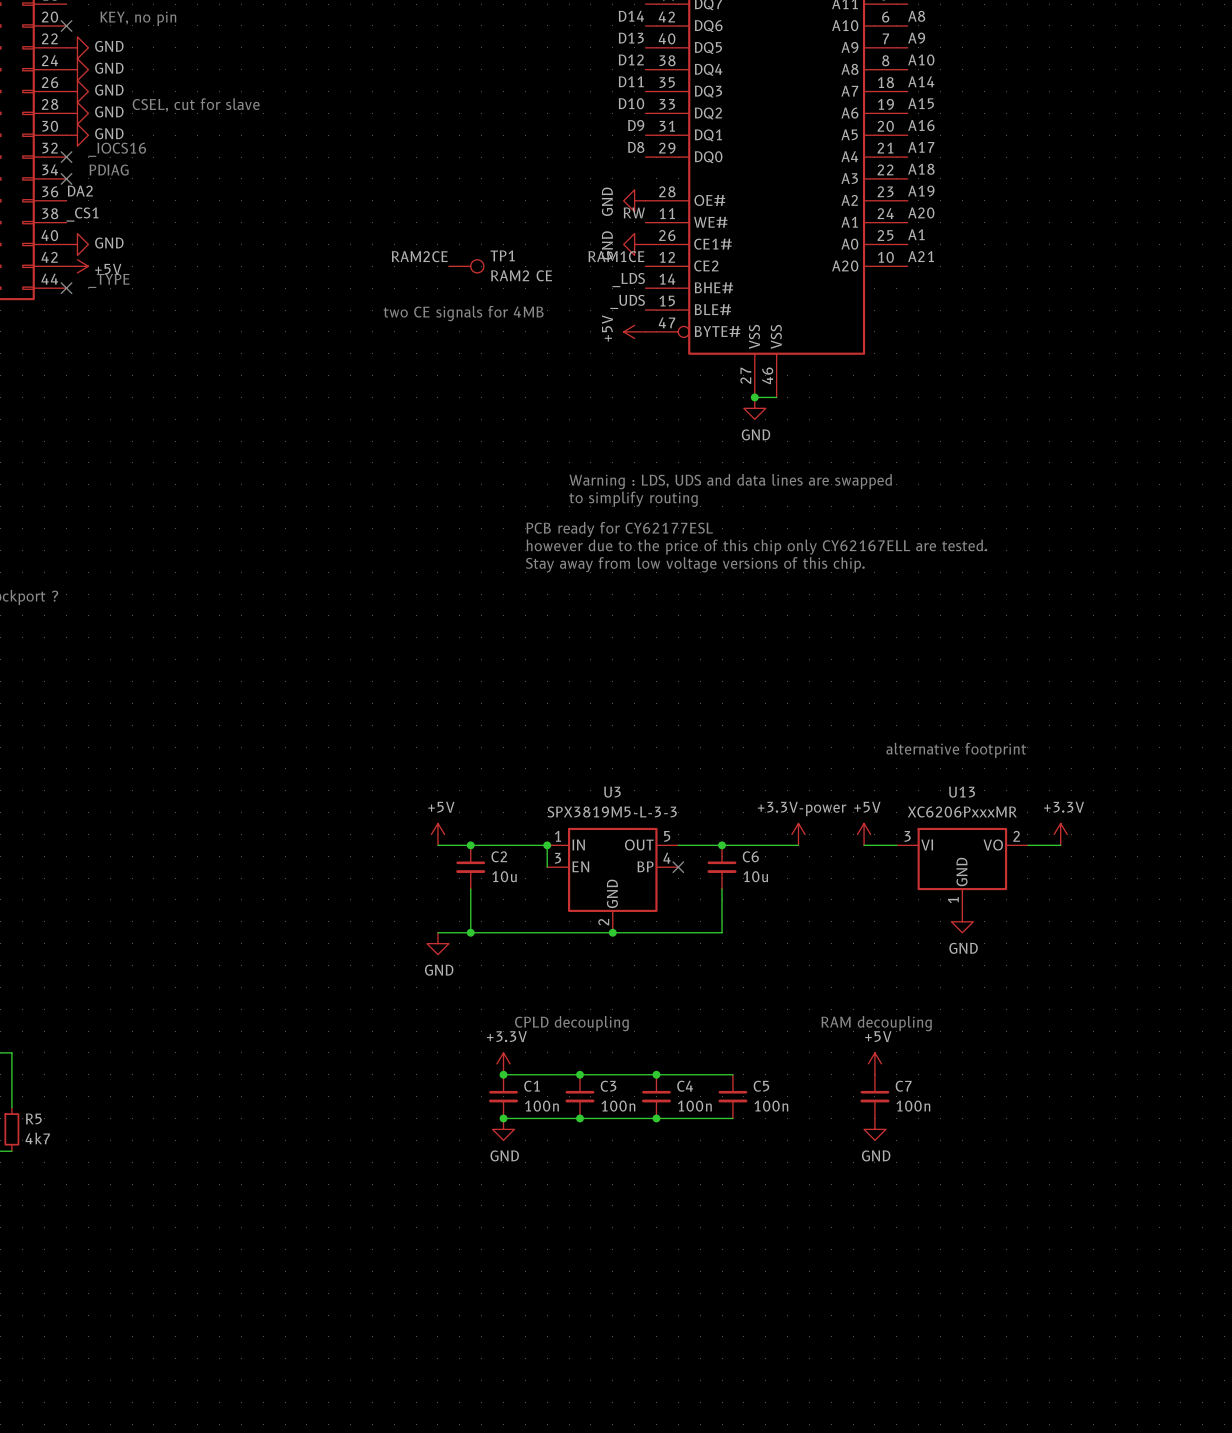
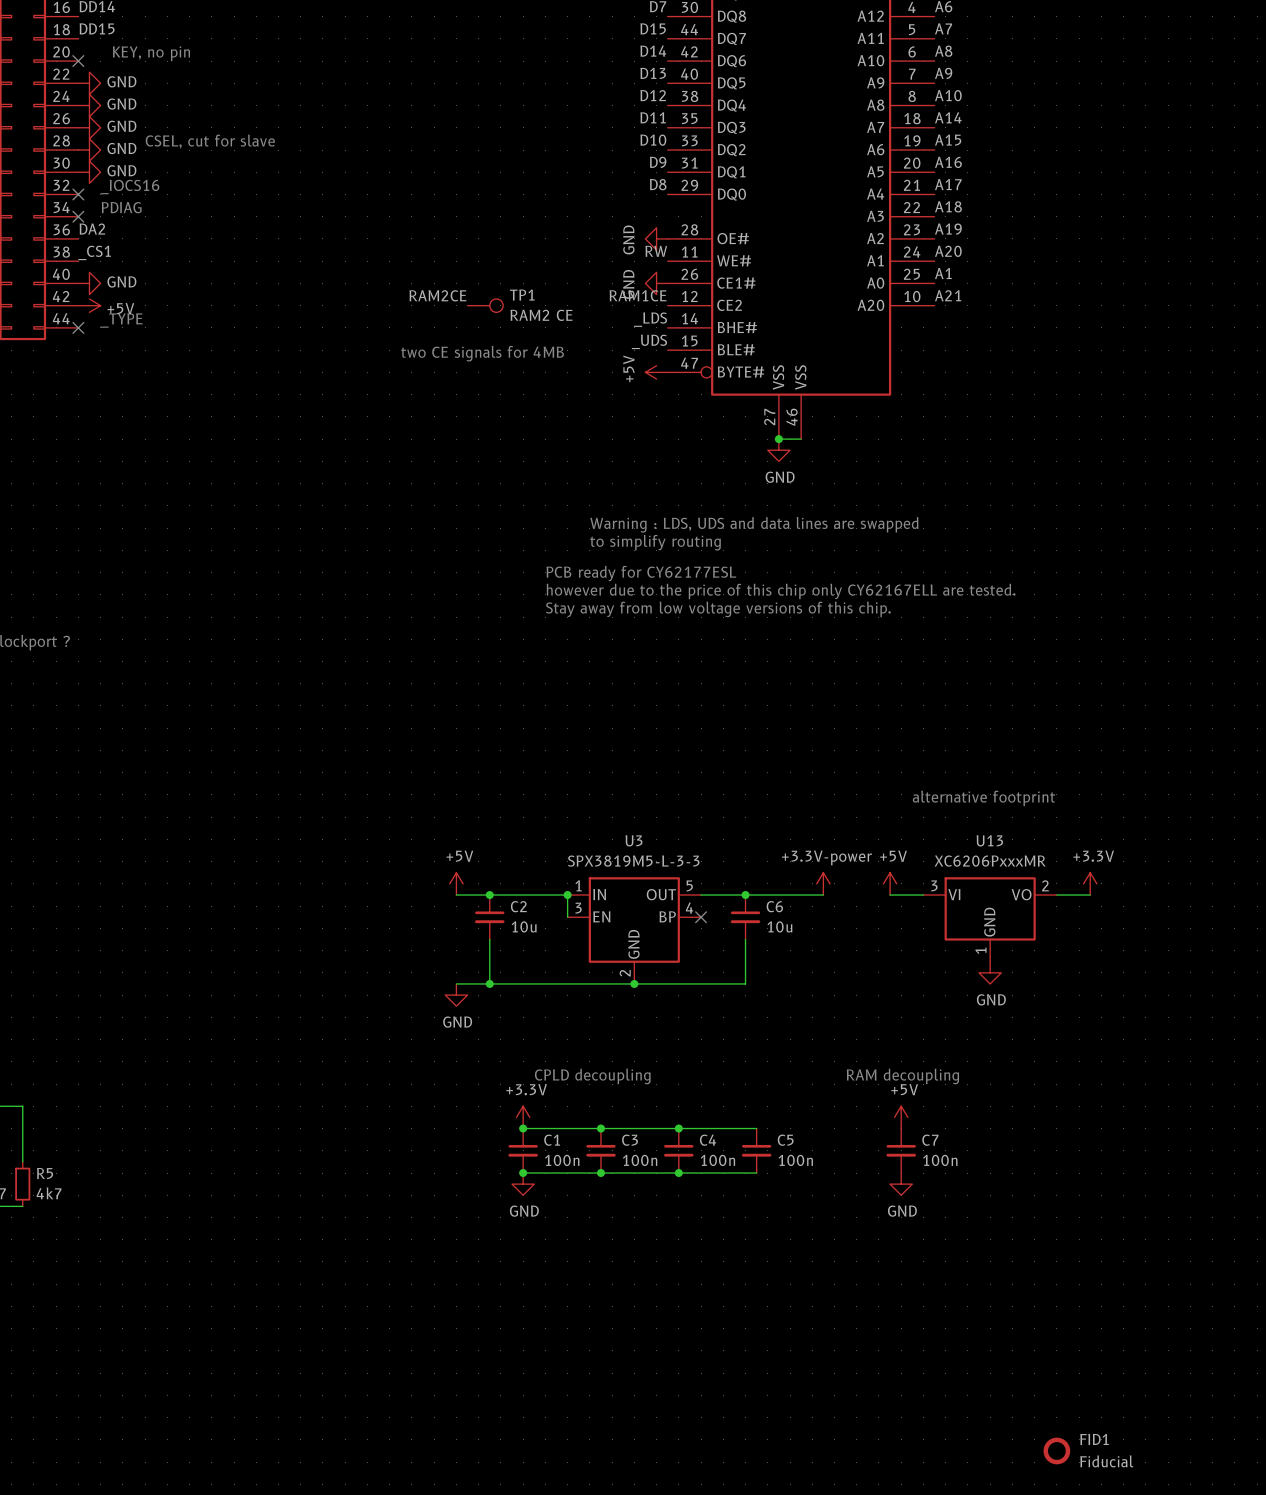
FID1: none -> Fiducial (1056, 1450)

